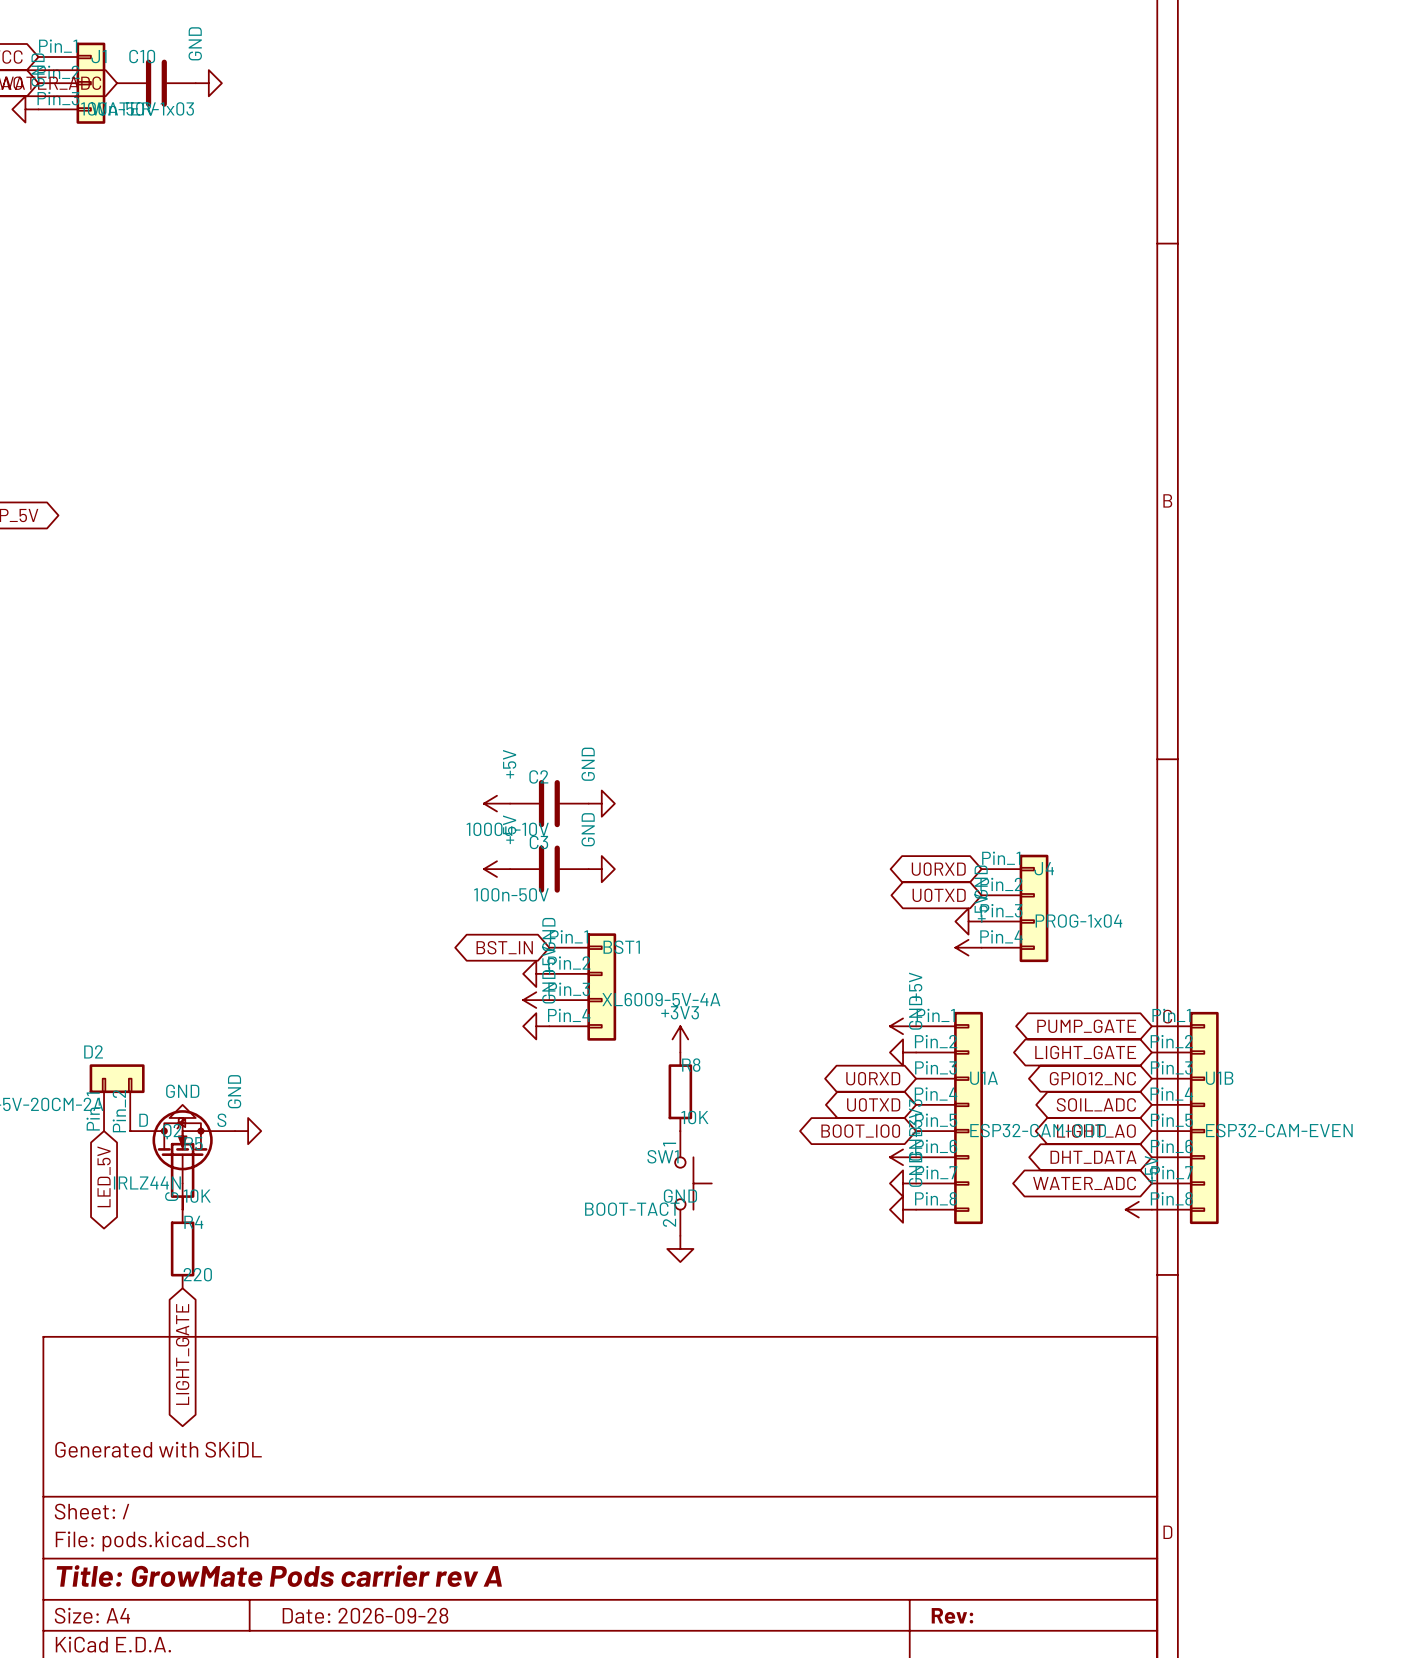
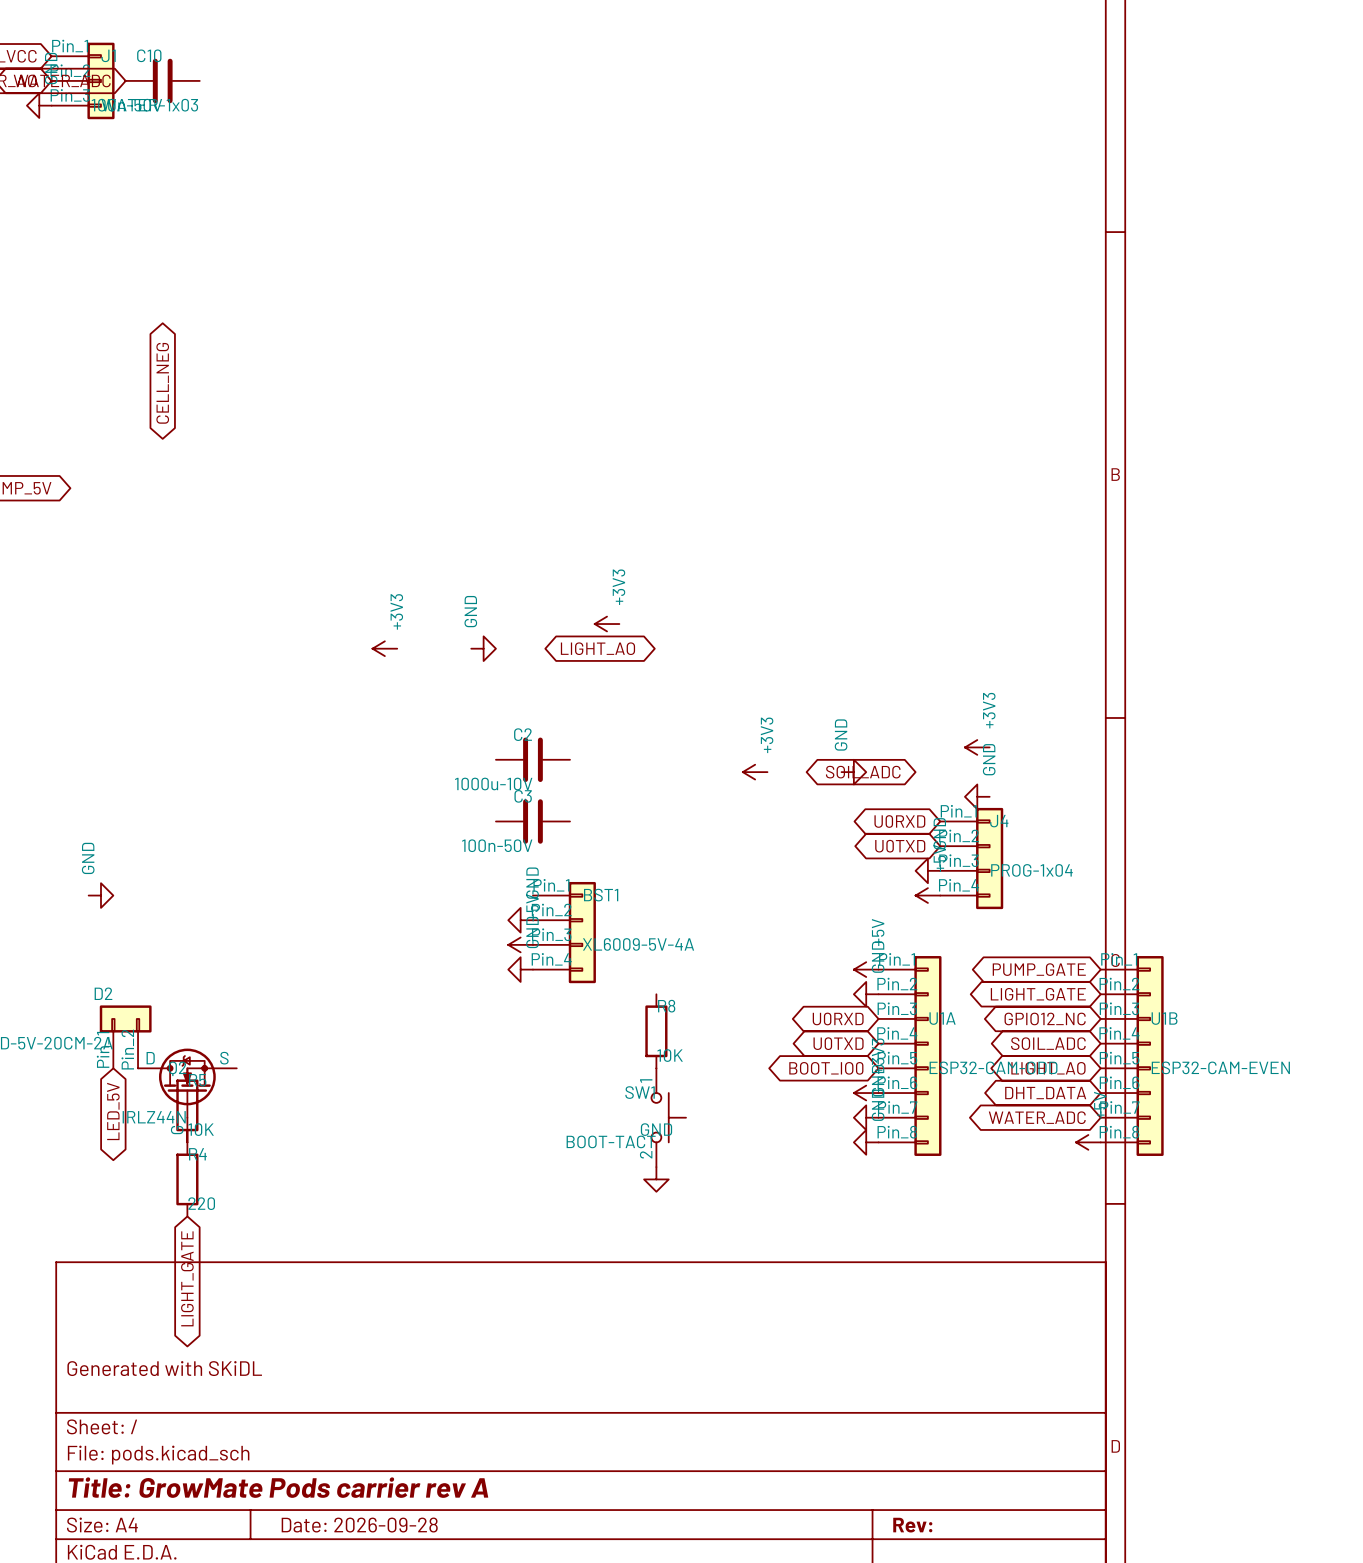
power symbol: GND (208, 83) -> none
global label: none -> CELL_NEG (162, 383)
power symbol: none -> +3V3 (607, 624)
power symbol: none -> +3V3 (384, 648)
power symbol: none -> GND (483, 648)
global label: none -> LIGHT_AO (597, 648)
power symbol: none -> +3V3 (977, 747)
power symbol: +5V (496, 803) -> none
power symbol: GND (601, 803) -> none
power symbol: none -> +3V3 (755, 772)
power symbol: none -> GND (853, 772)
global label: none -> SOIL_ADC (863, 772)
power symbol: none -> GND (977, 796)
power symbol: +5V (496, 869) -> none
power symbol: GND (601, 869) -> none
power symbol: none -> GND (100, 895)
global label: BST_IN (504, 947) -> none
power symbol: +3V3 (680, 1039) -> none
power symbol: GND (182, 1117) -> none
power symbol: GND (248, 1131) -> none

